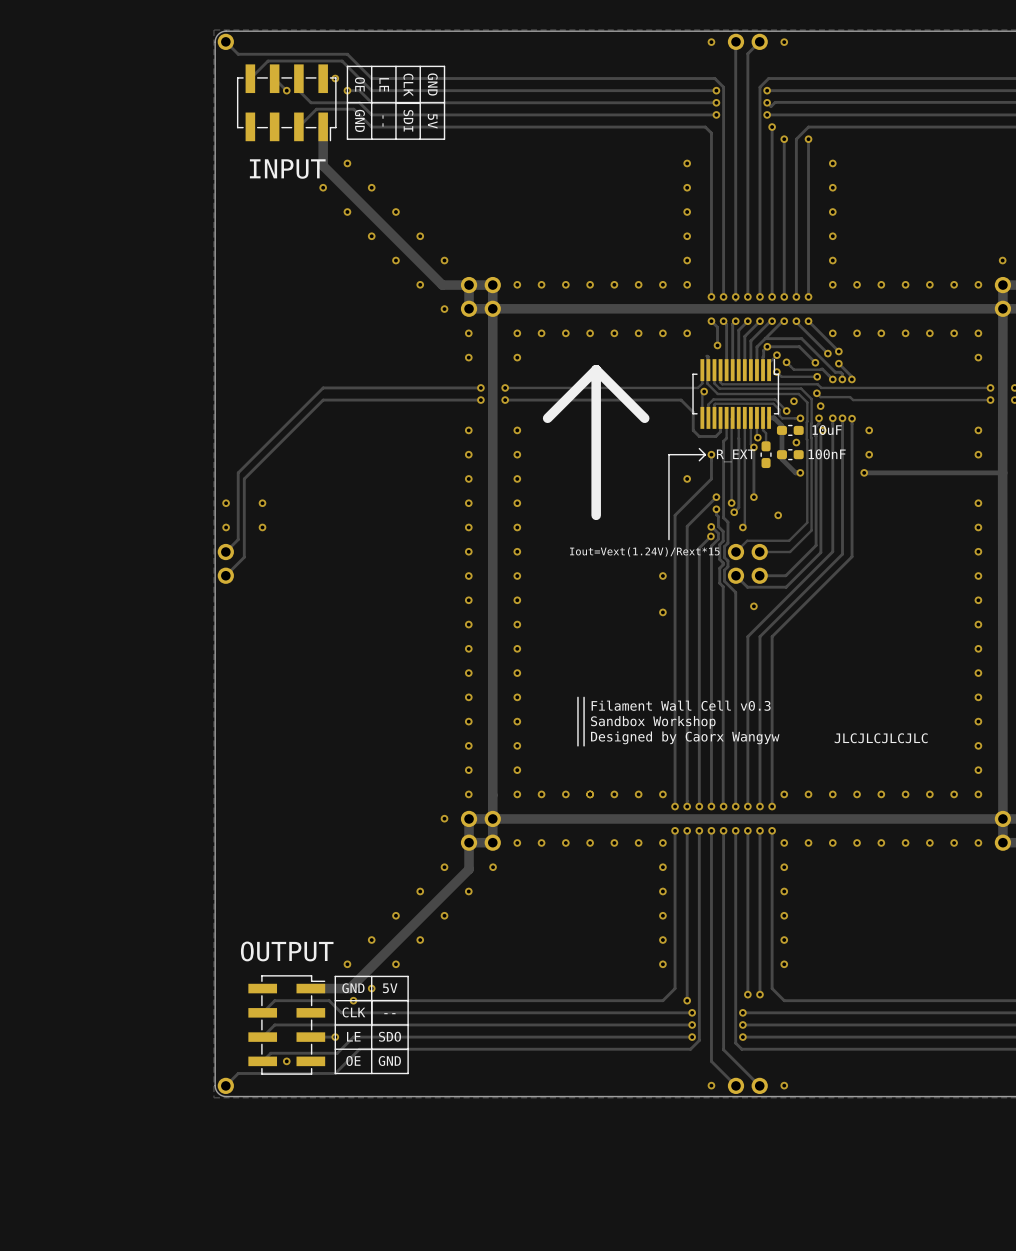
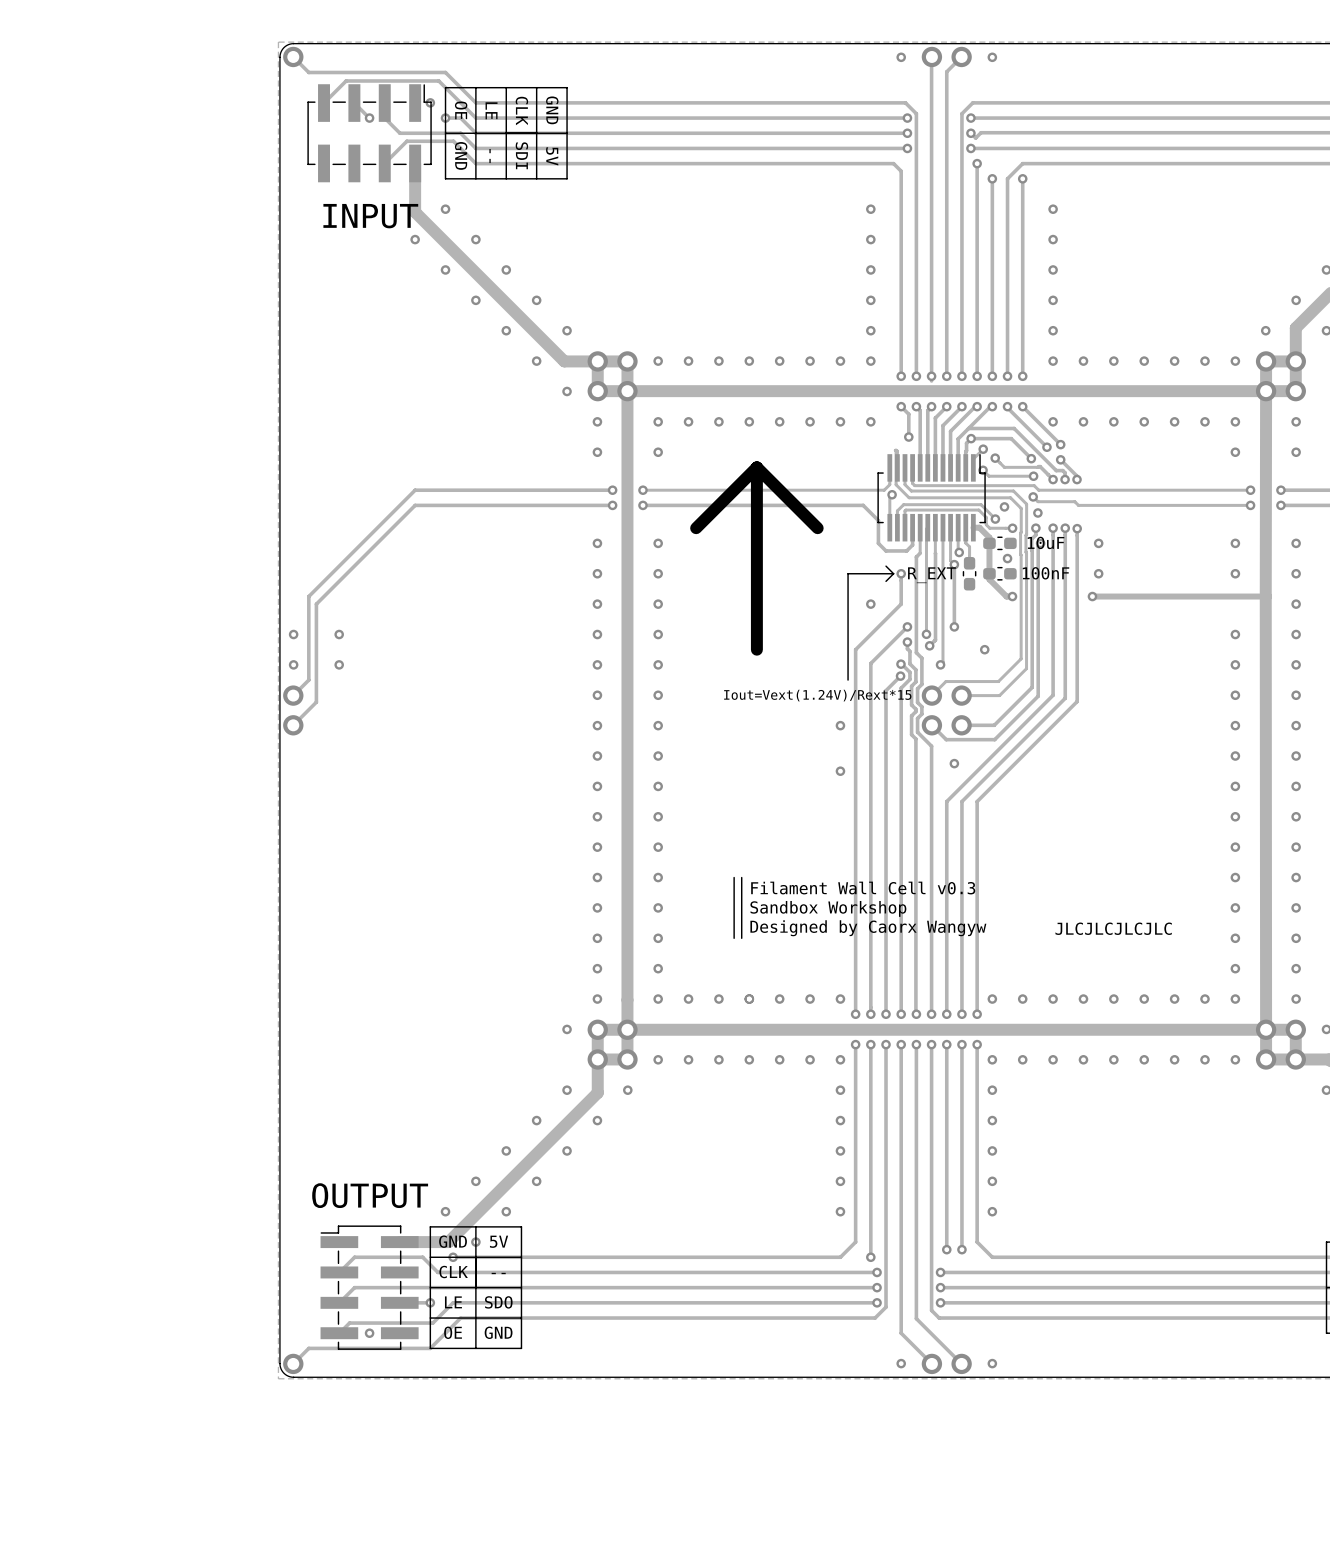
part footprint: [237, 64, 337, 142] -> [307, 84, 432, 183]
part footprint: [248, 975, 326, 1075] -> [320, 1225, 419, 1350]

